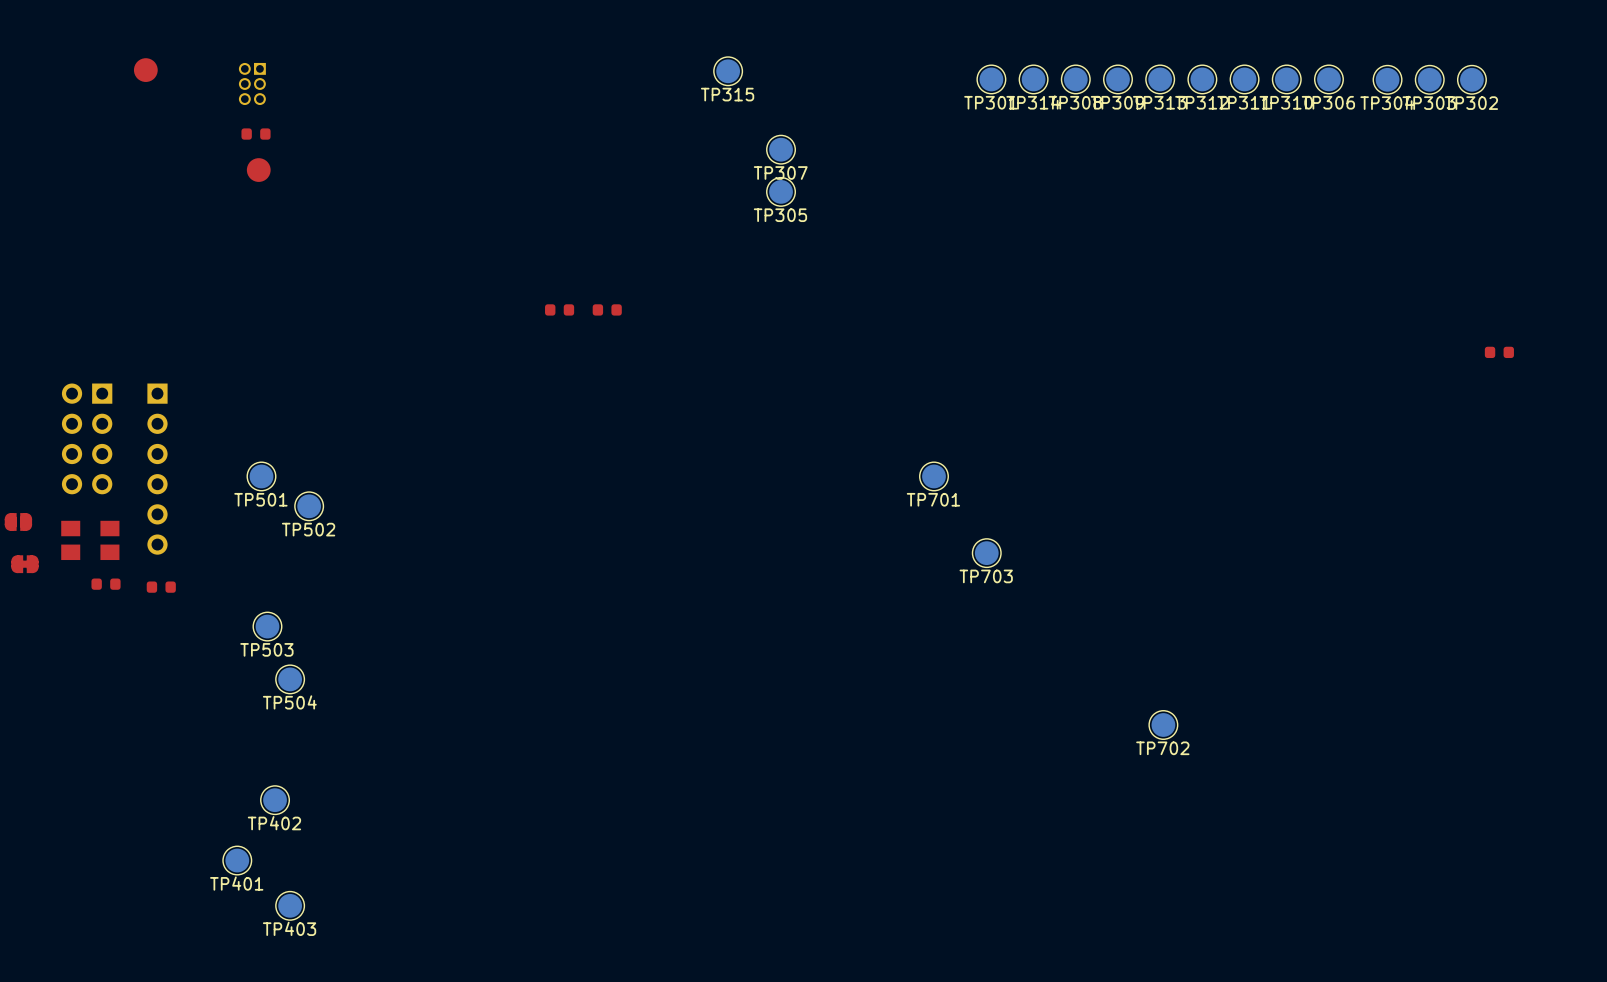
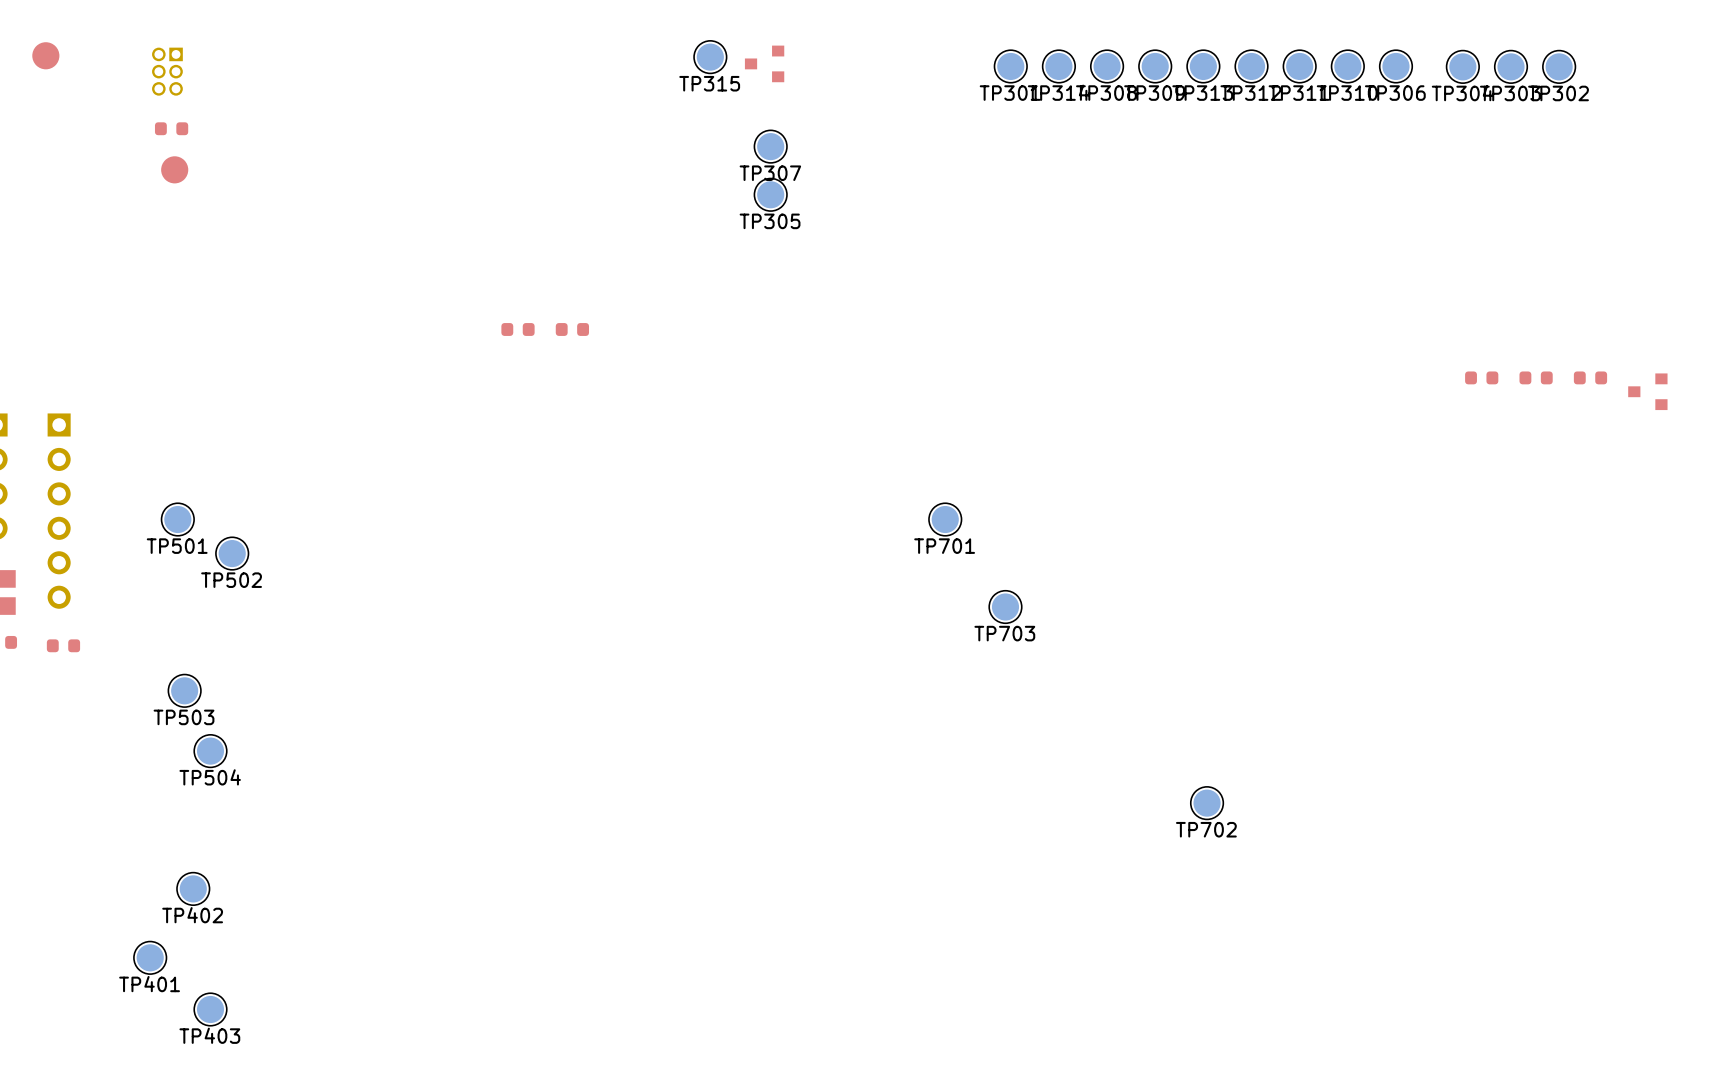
part: none -> (764, 63)
part: none -> (1481, 377)
part: none -> (1536, 377)
part: none -> (1647, 391)

